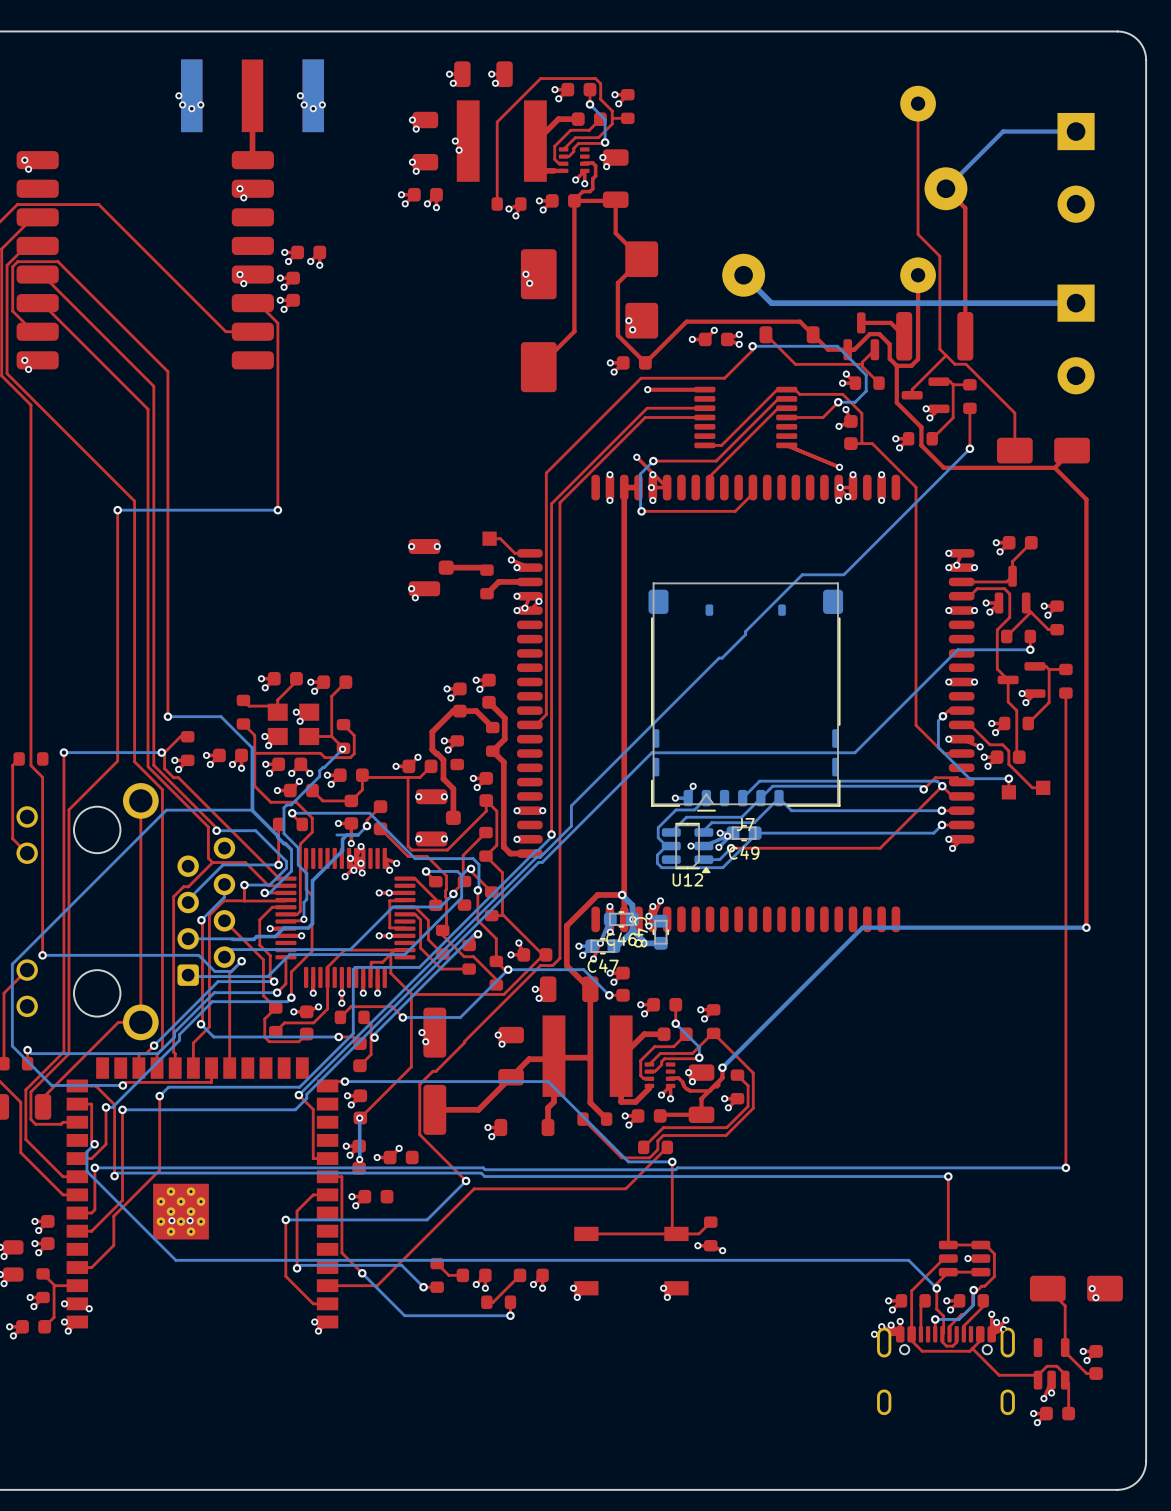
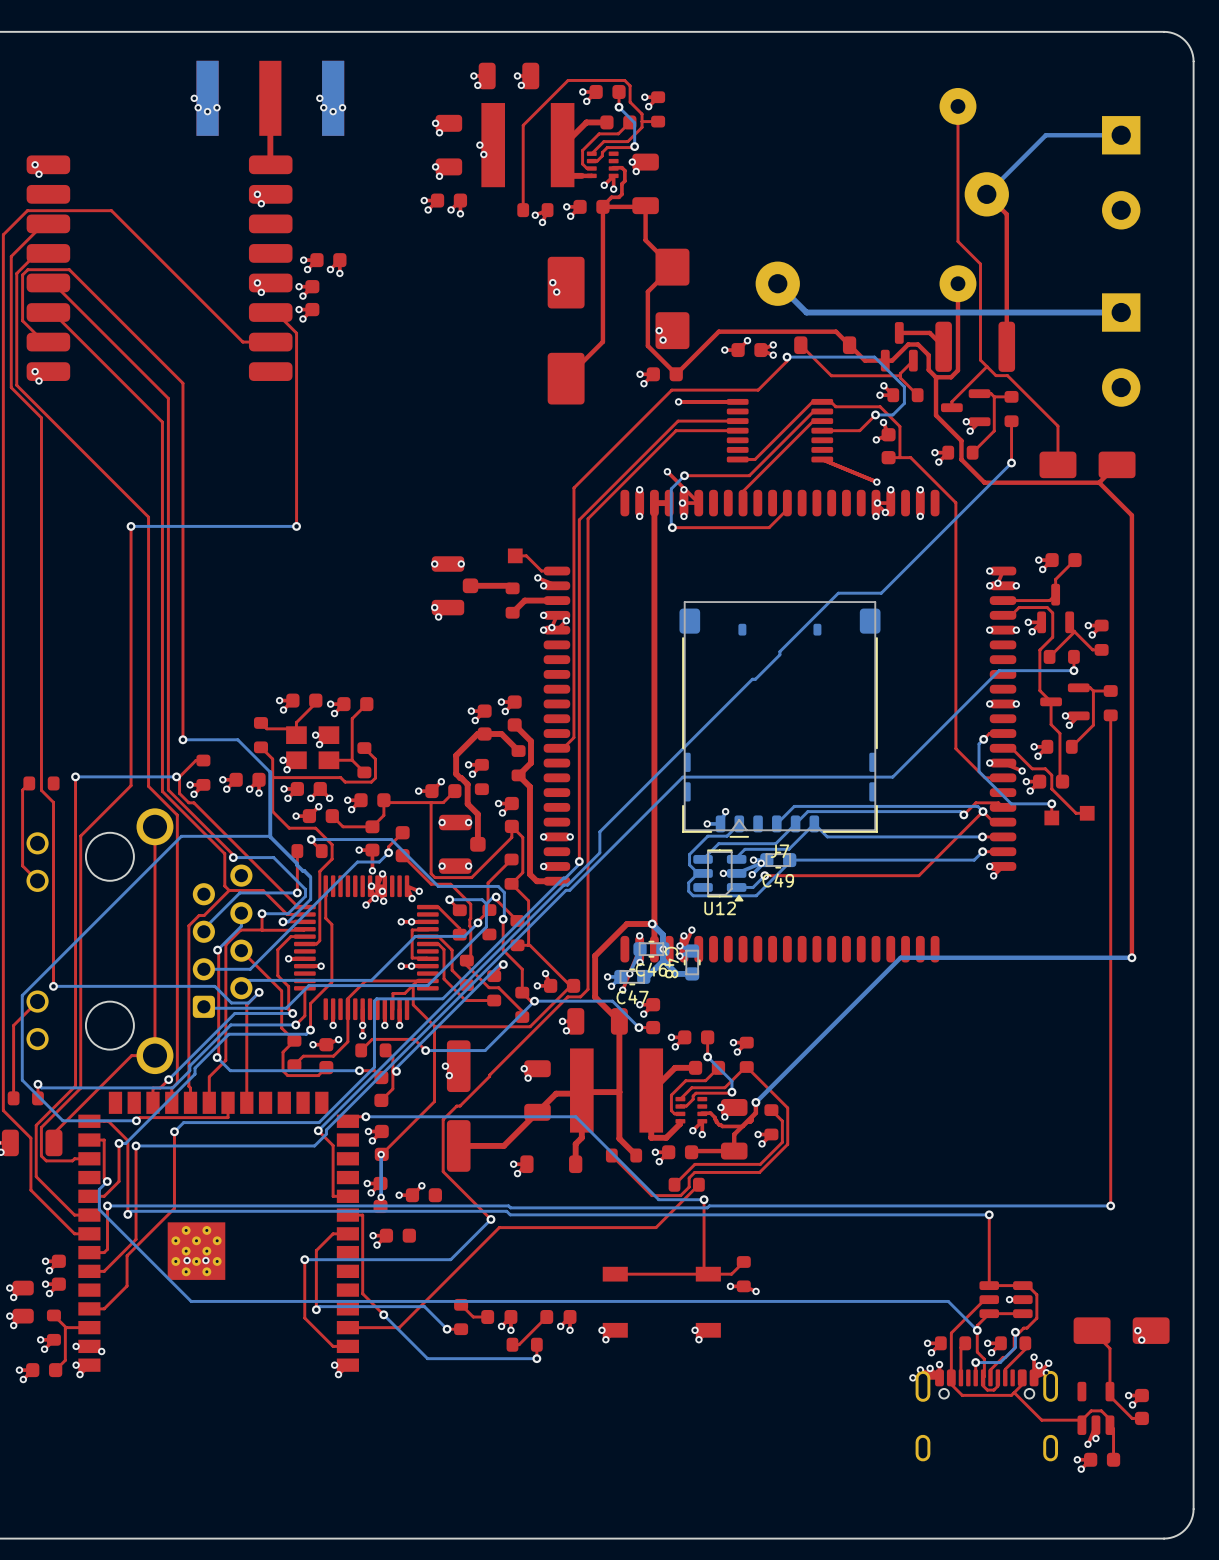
bottom track: (342, 749) (319, 770) (319, 776) (291, 804) (286, 804) (283, 807) (283, 833) (298, 847) (298, 865) (306, 873) (306, 899) (303, 902) (303, 919) -> none
via: (342, 749) -> none
bottom track: none -> (357, 862) (250, 969)
bottom track: (358, 835) (346, 835) (342, 839) (342, 850) (312, 880) (312, 923) (308, 927) (283, 927) (275, 936) (232, 939) -> none
top track: (303, 919) (285, 920) -> none
via: (303, 919) -> none

